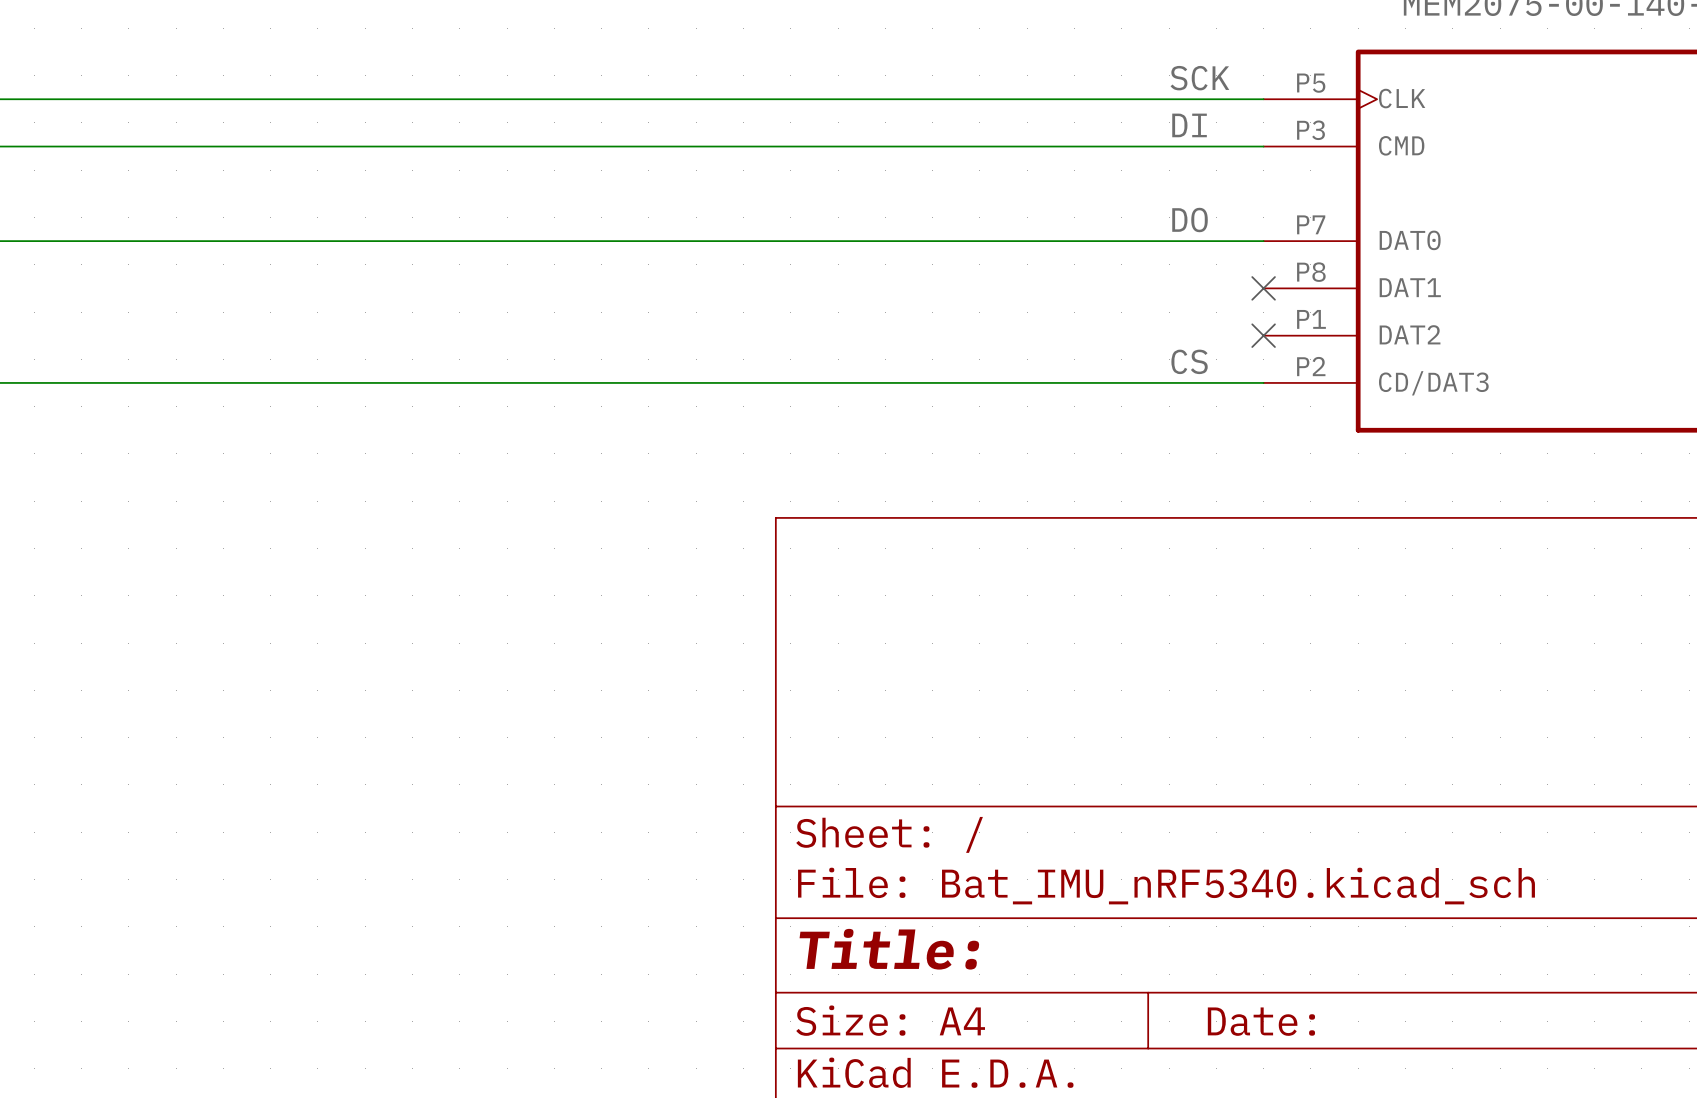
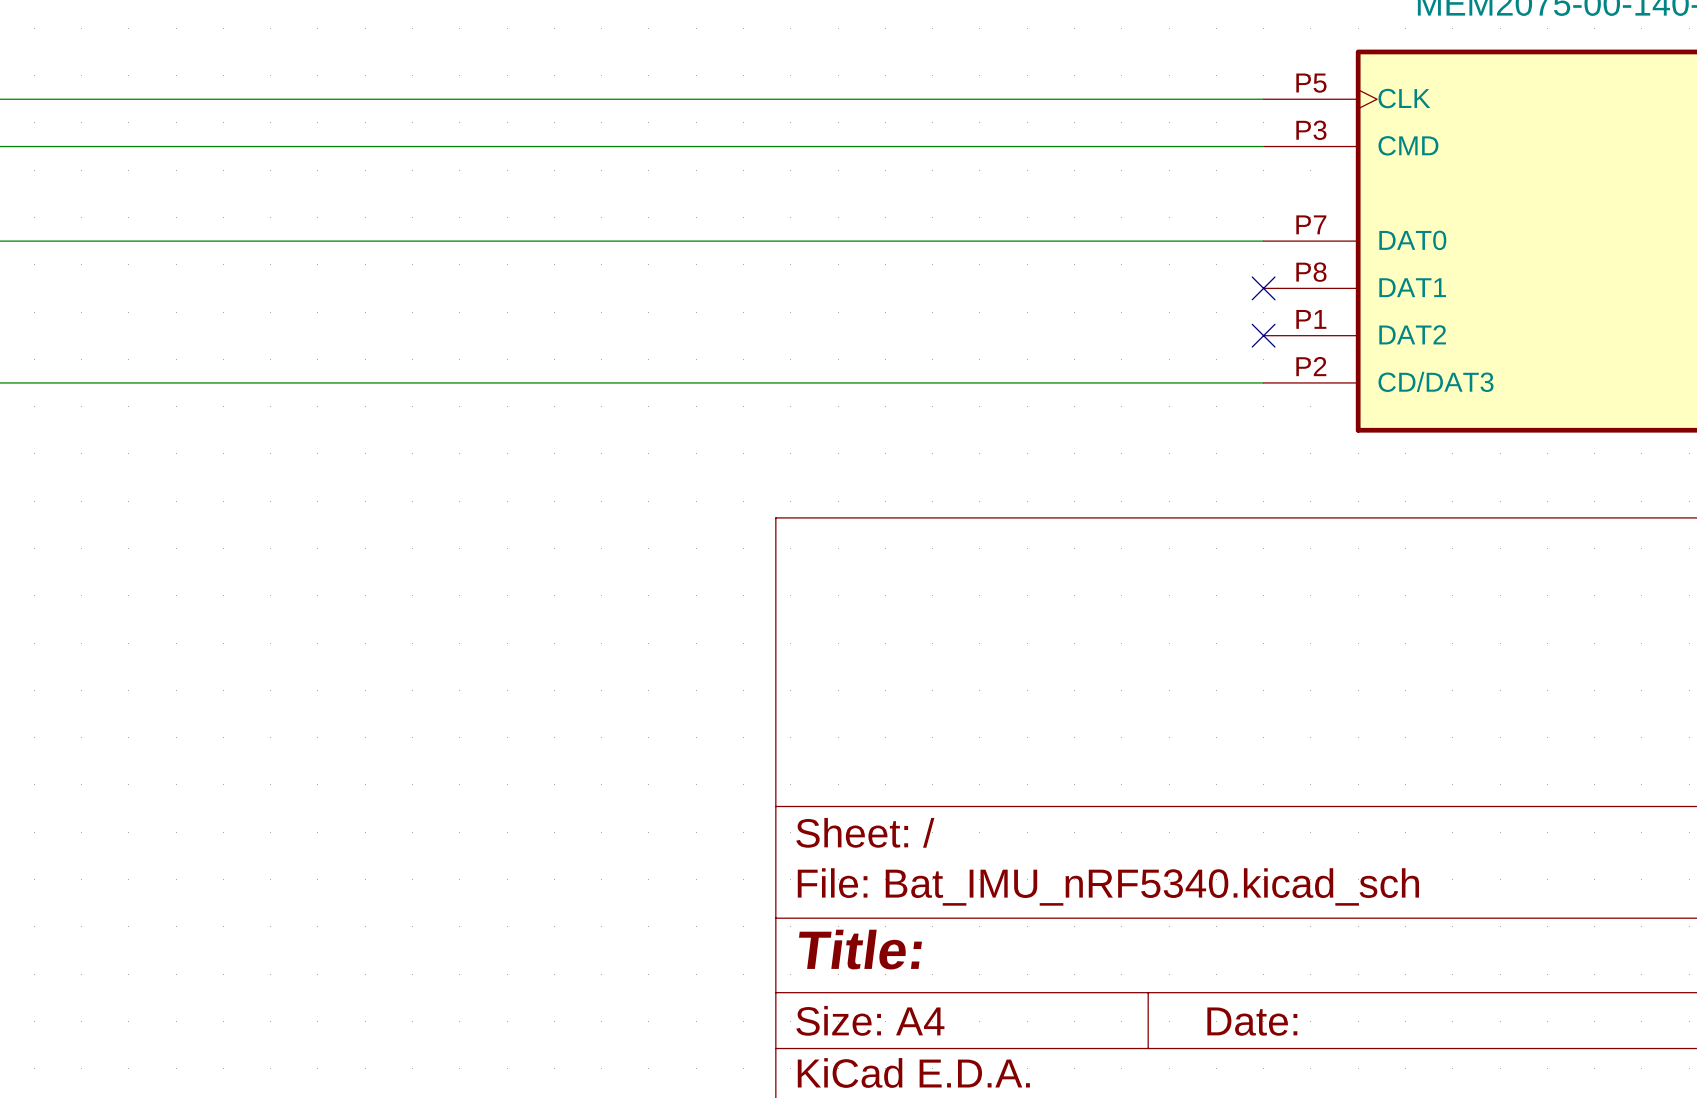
label: SCK (1199, 78) -> none
label: DI (1189, 125) -> none
label: DO (1190, 220) -> none
label: CS (1189, 361) -> none

